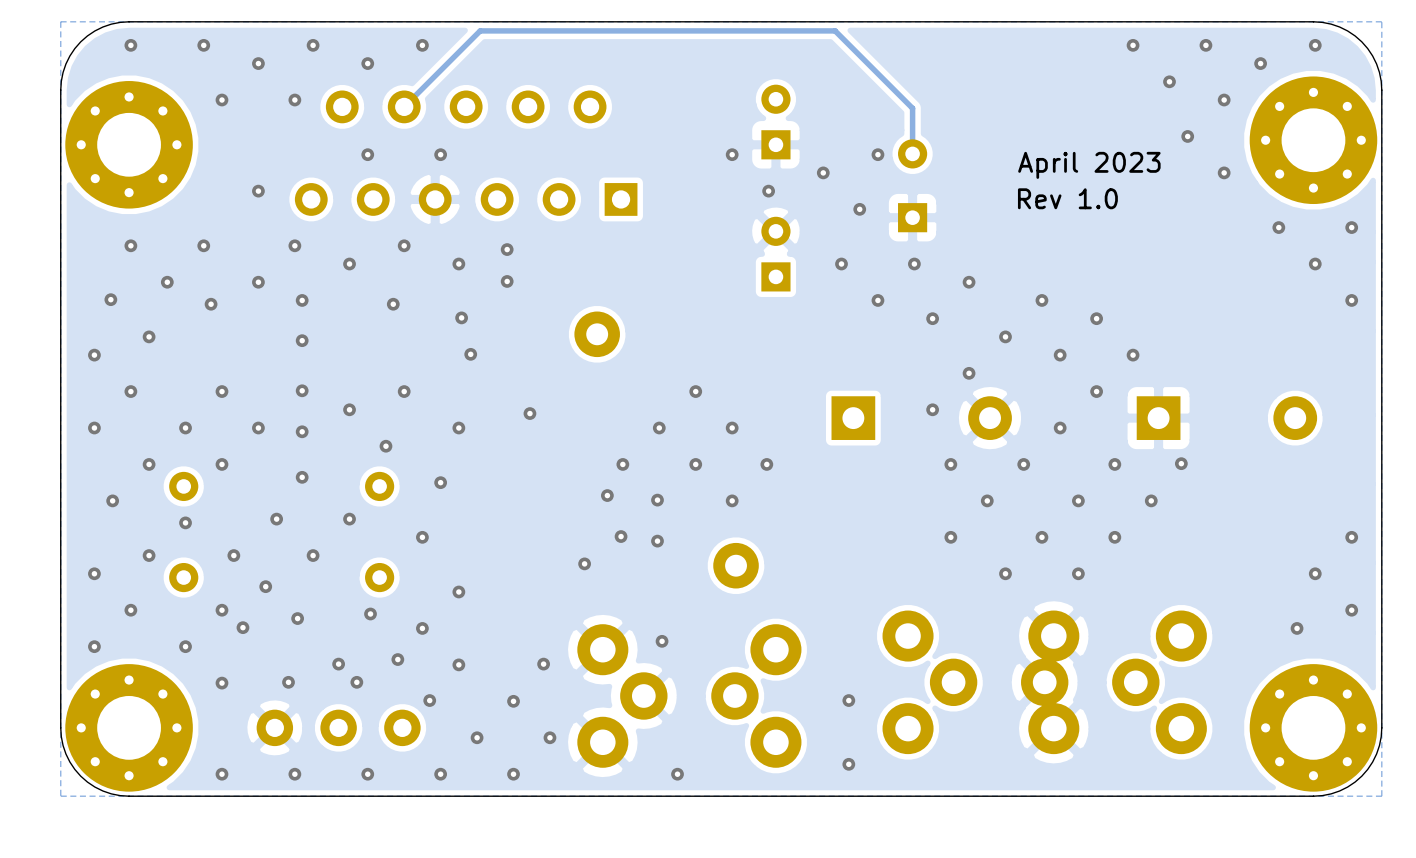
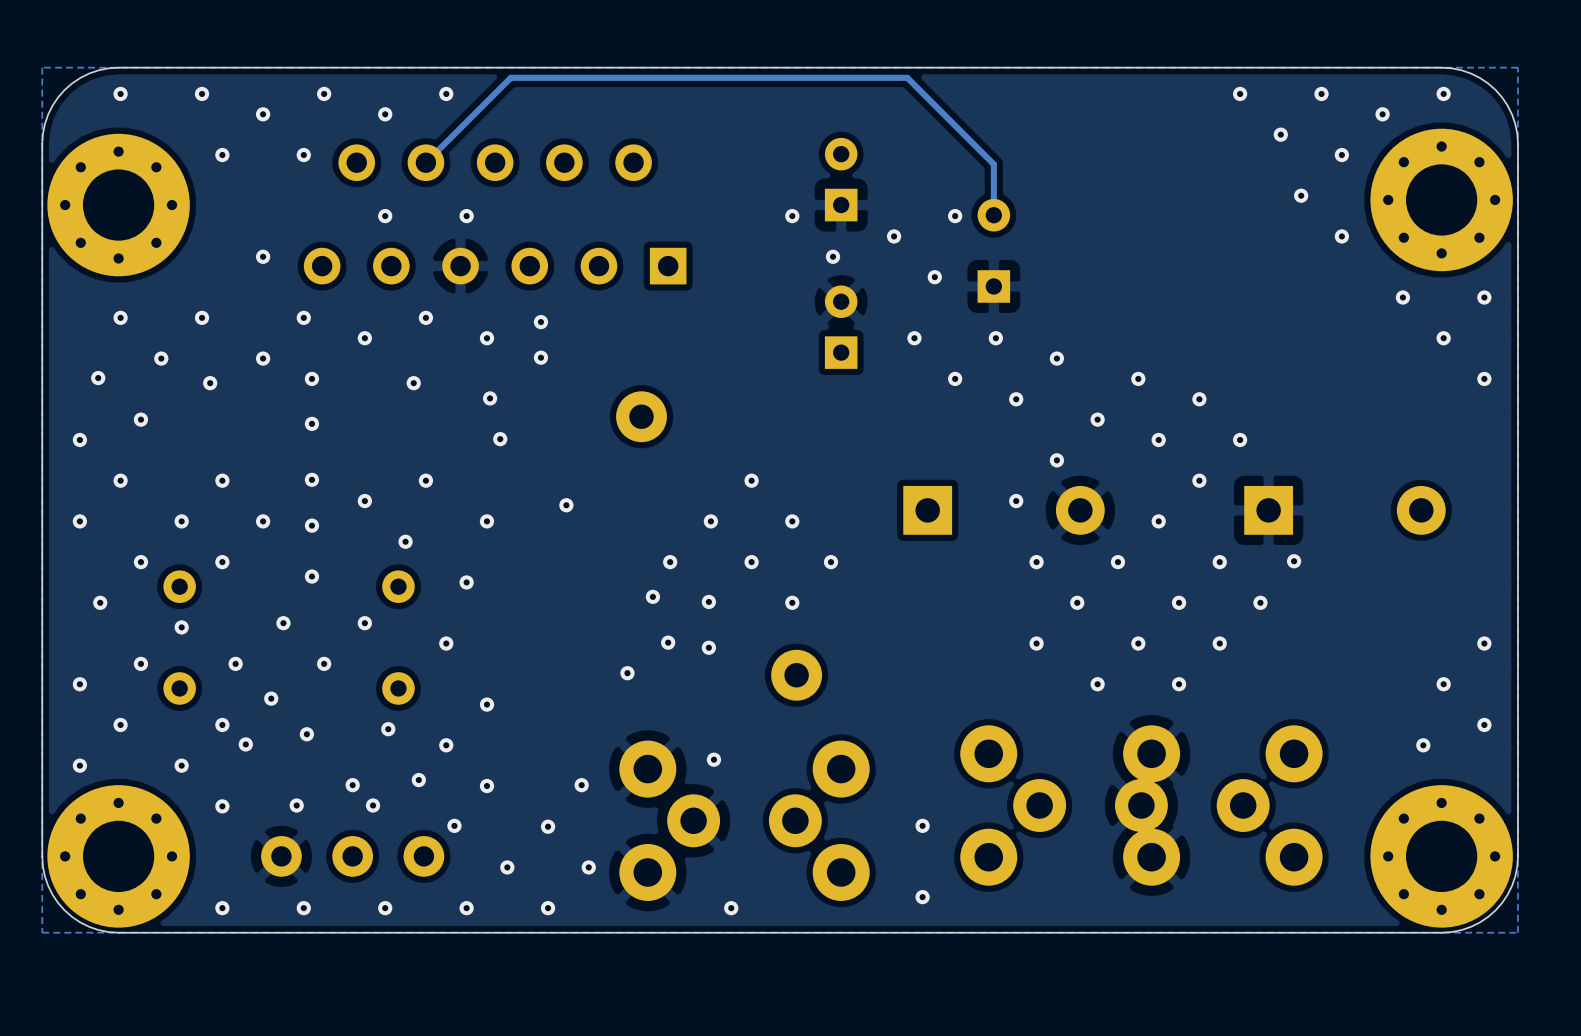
text: April 2023 (1089, 165) -> none
text: Rev 1.0 (1067, 198) -> none

